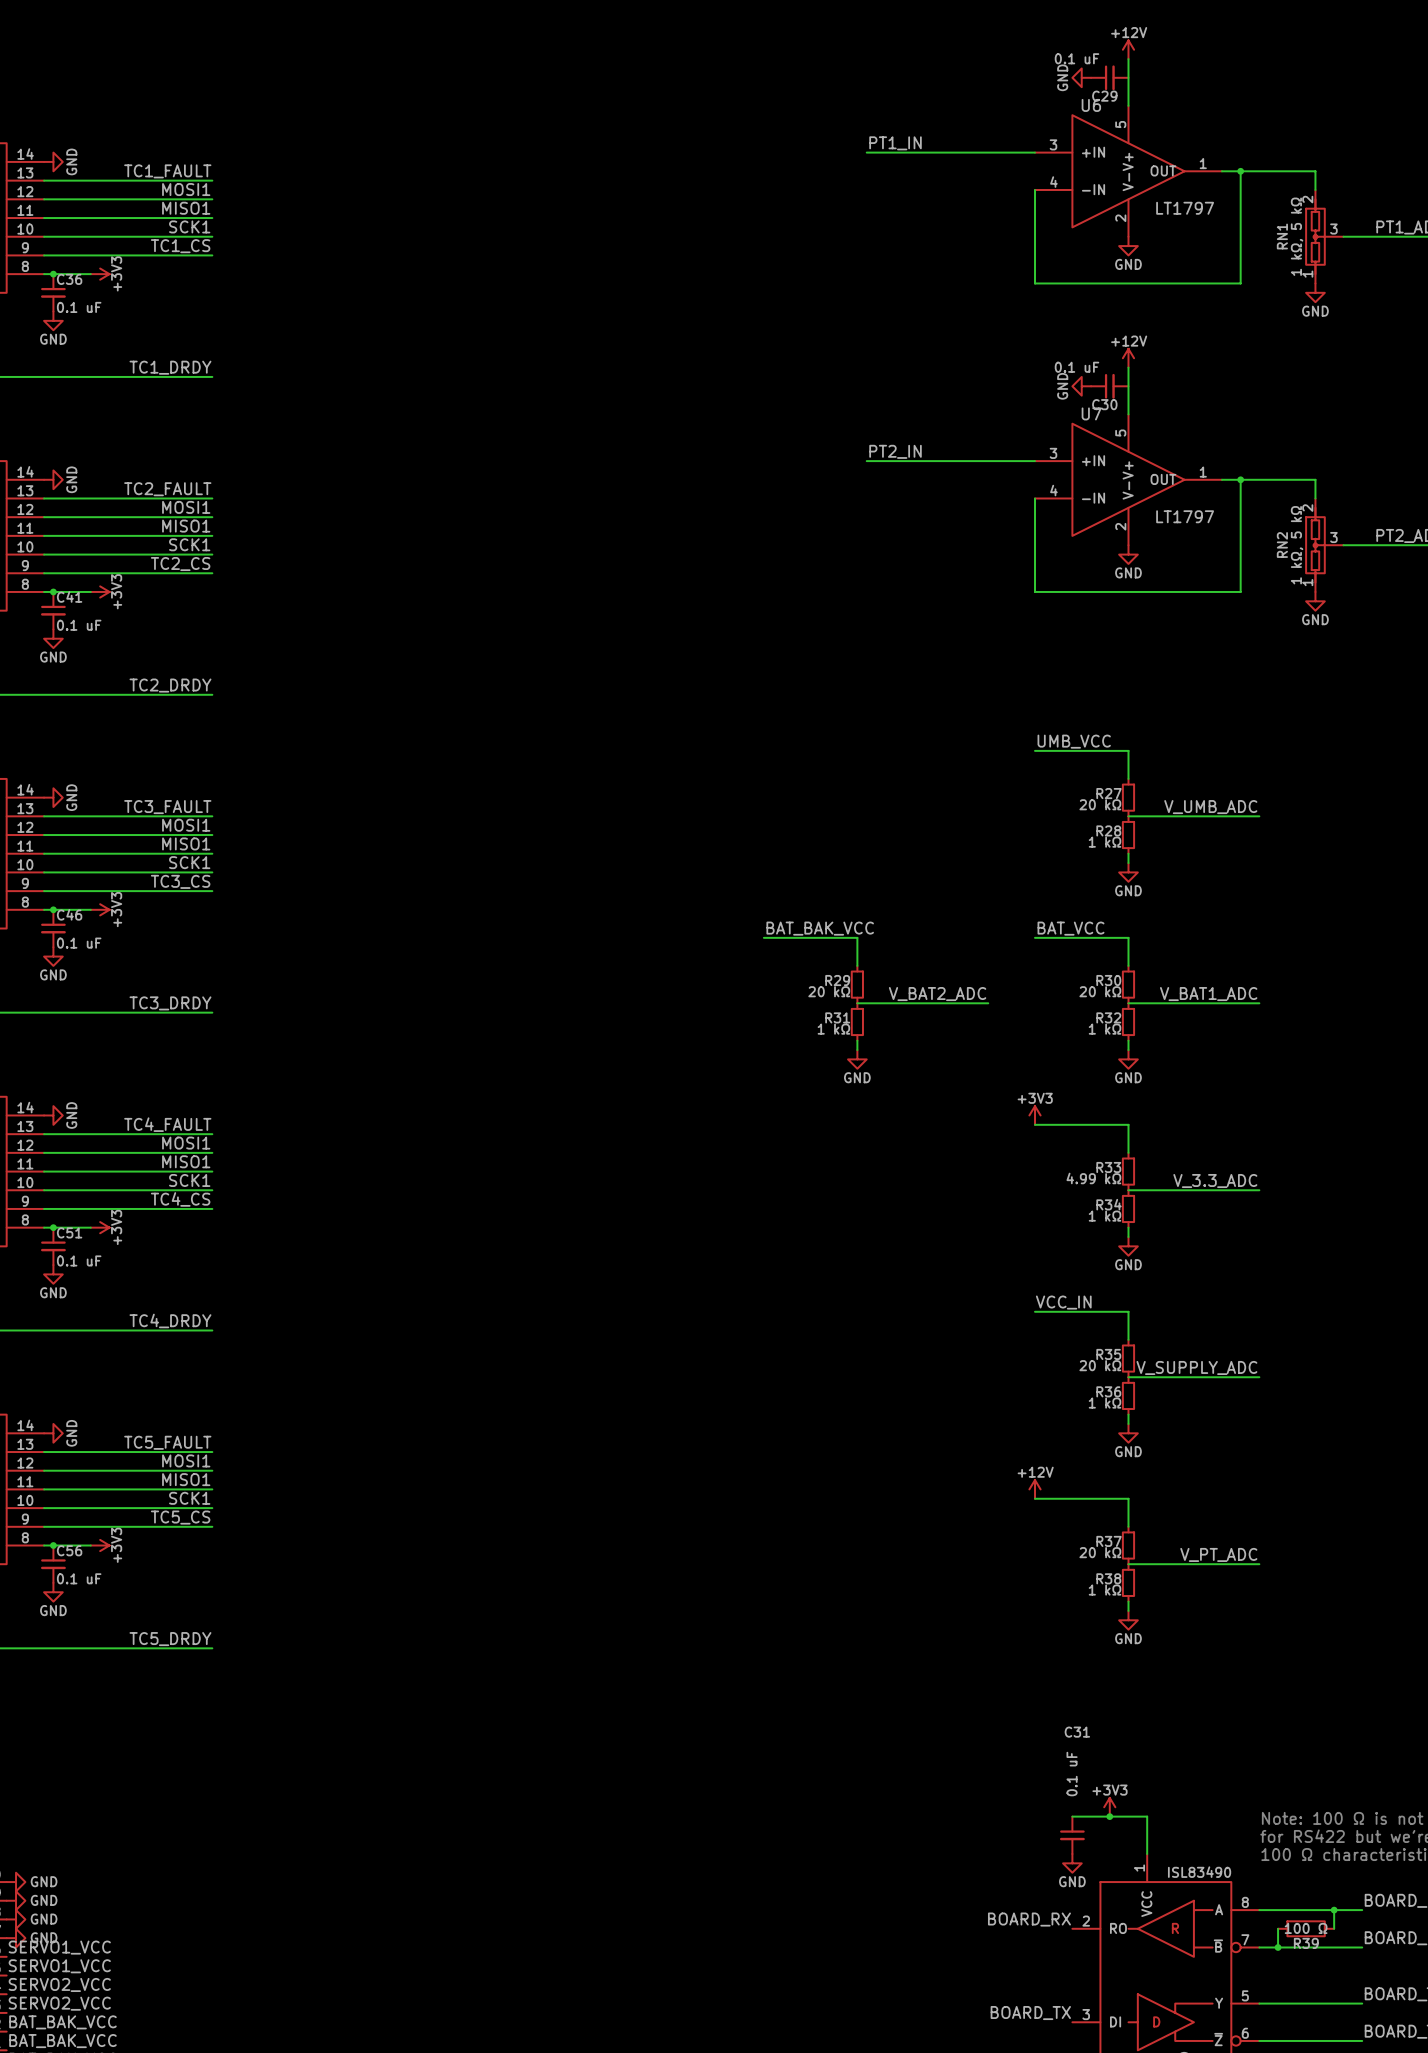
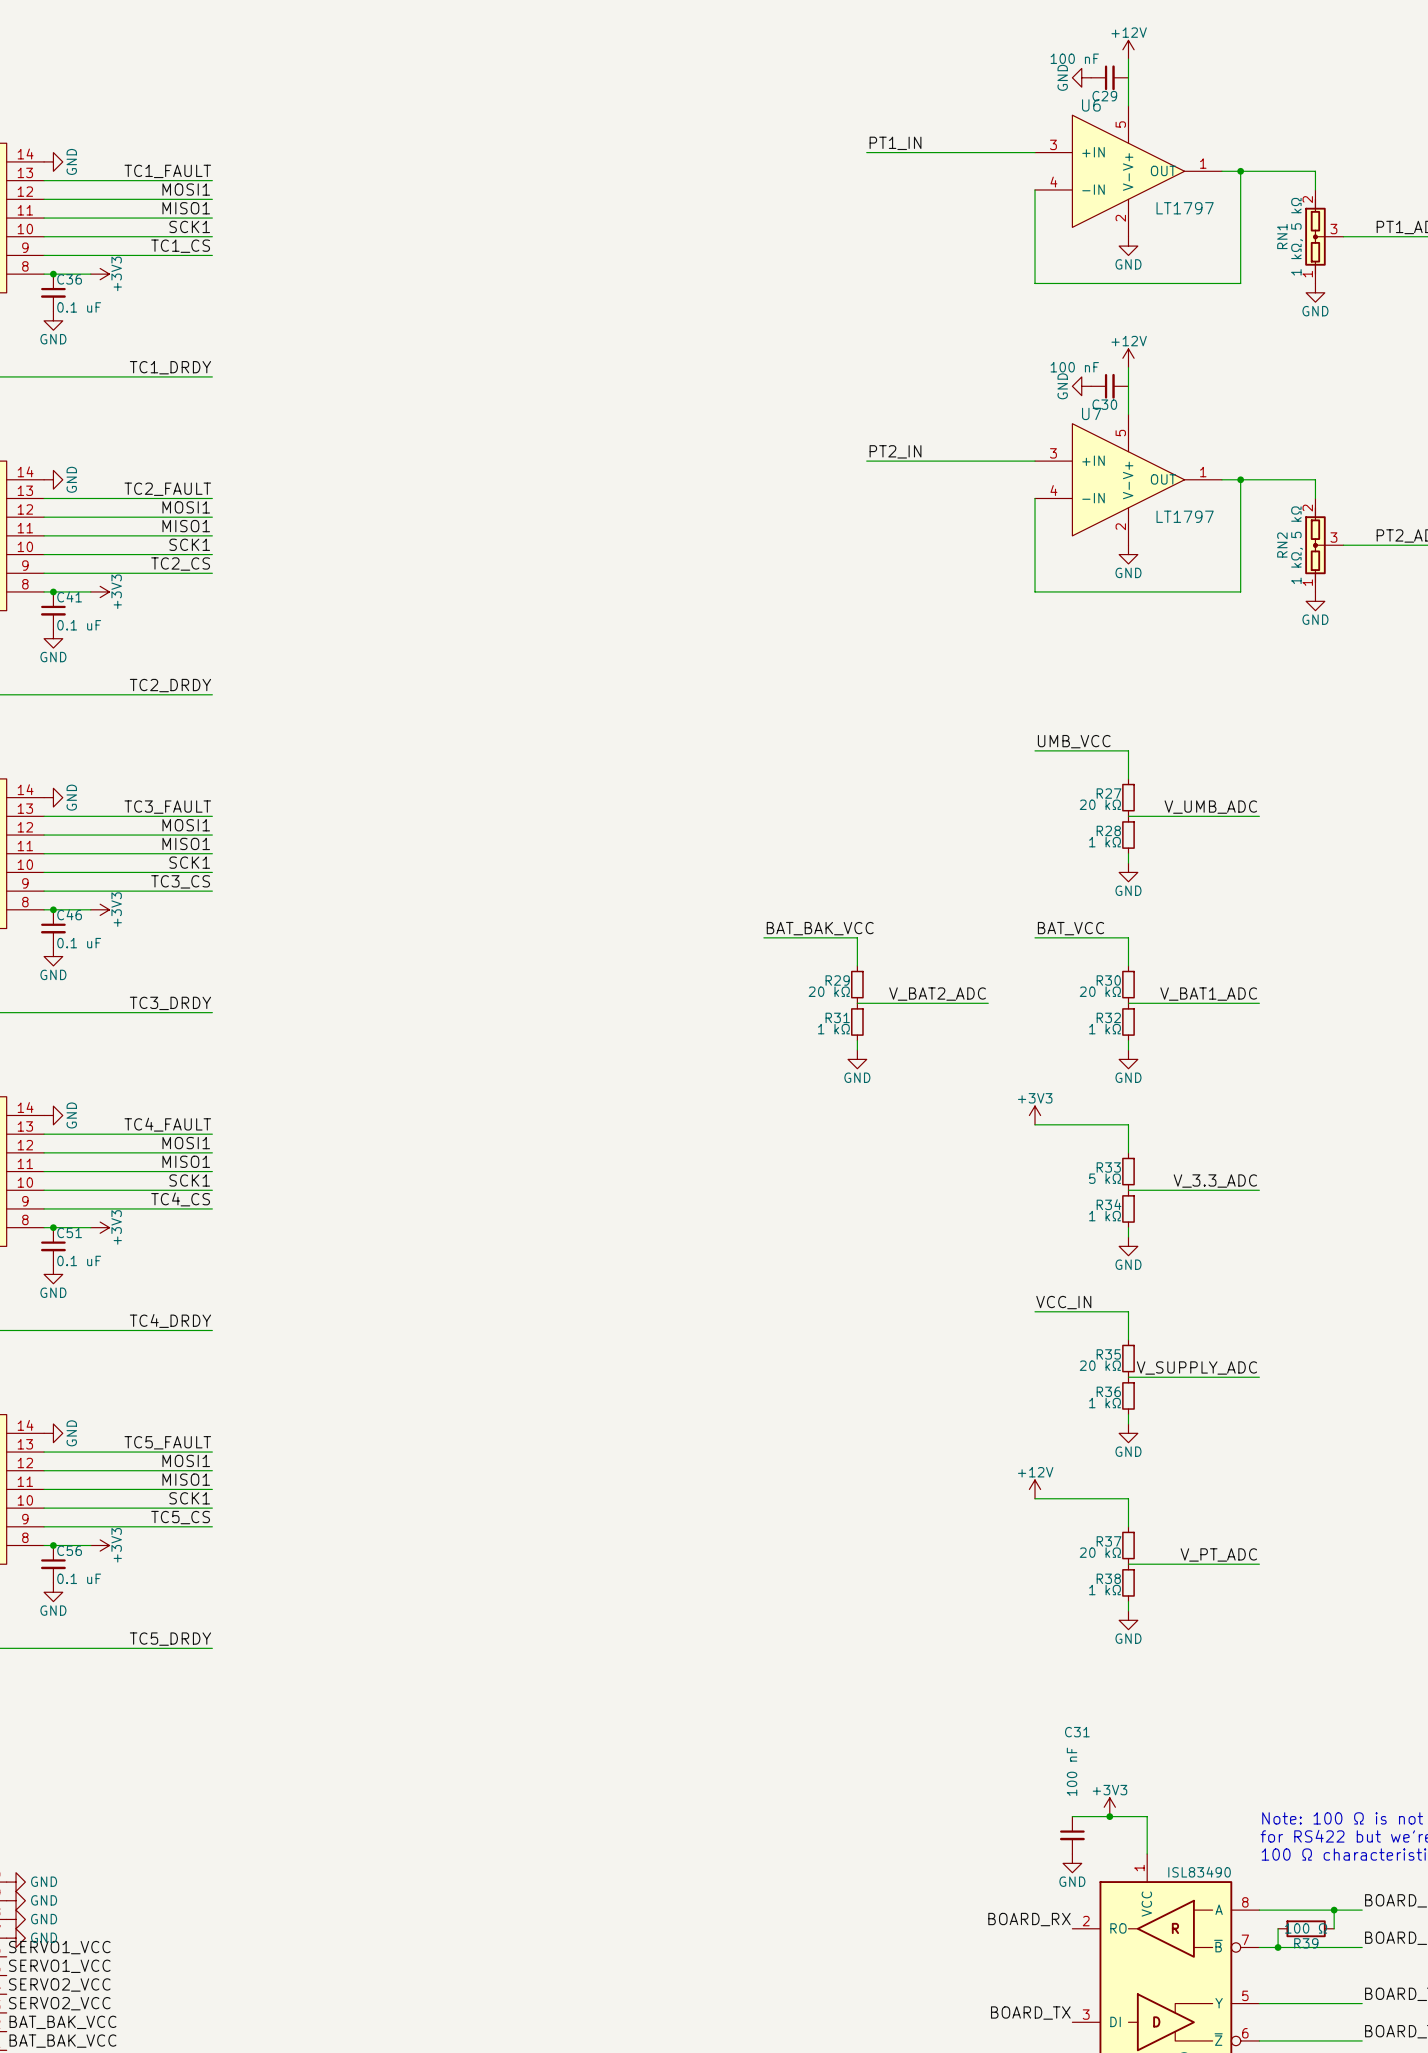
C29 value: 0.1 uF (1077, 58) -> 100 nF (1074, 58)
C30 value: 0.1 uF (1077, 367) -> 100 nF (1074, 367)
R33 value: 4.99 kΩ (1093, 1178) -> 5 kΩ (1105, 1178)
C31 value: 0.1 uF (1072, 1774) -> 100 nF (1072, 1771)

